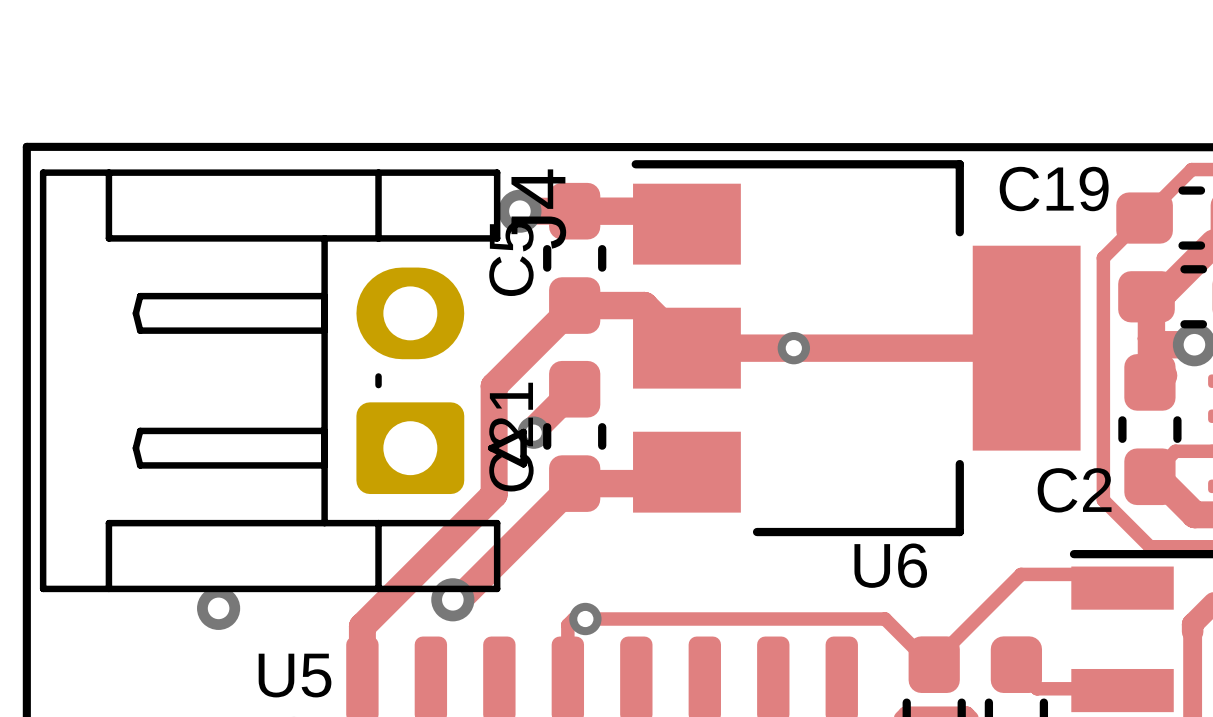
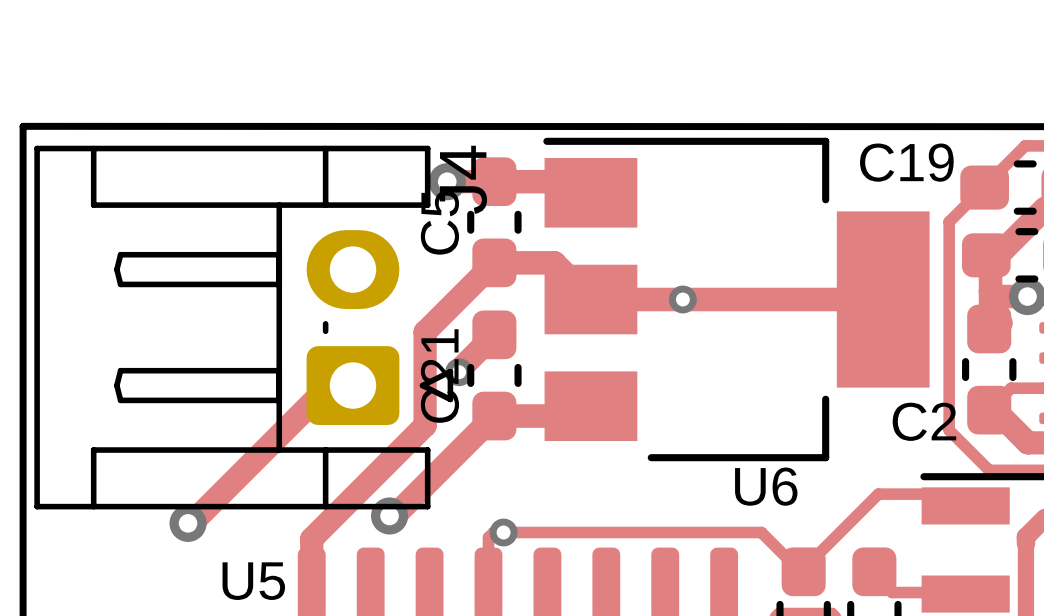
track: none -> (352, 385) (329, 385) (191, 523) (188, 523)

